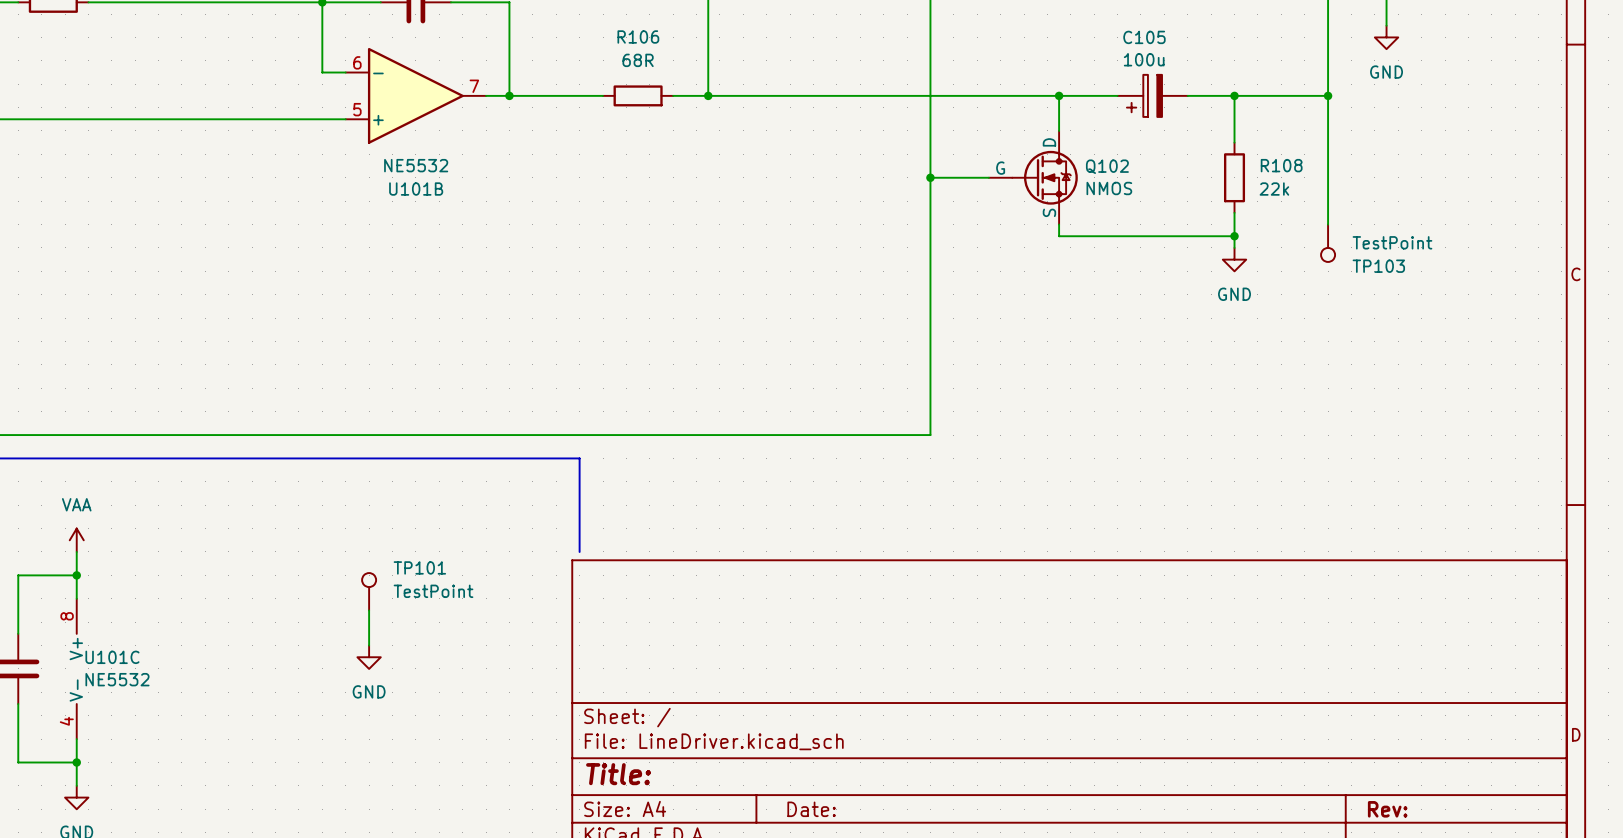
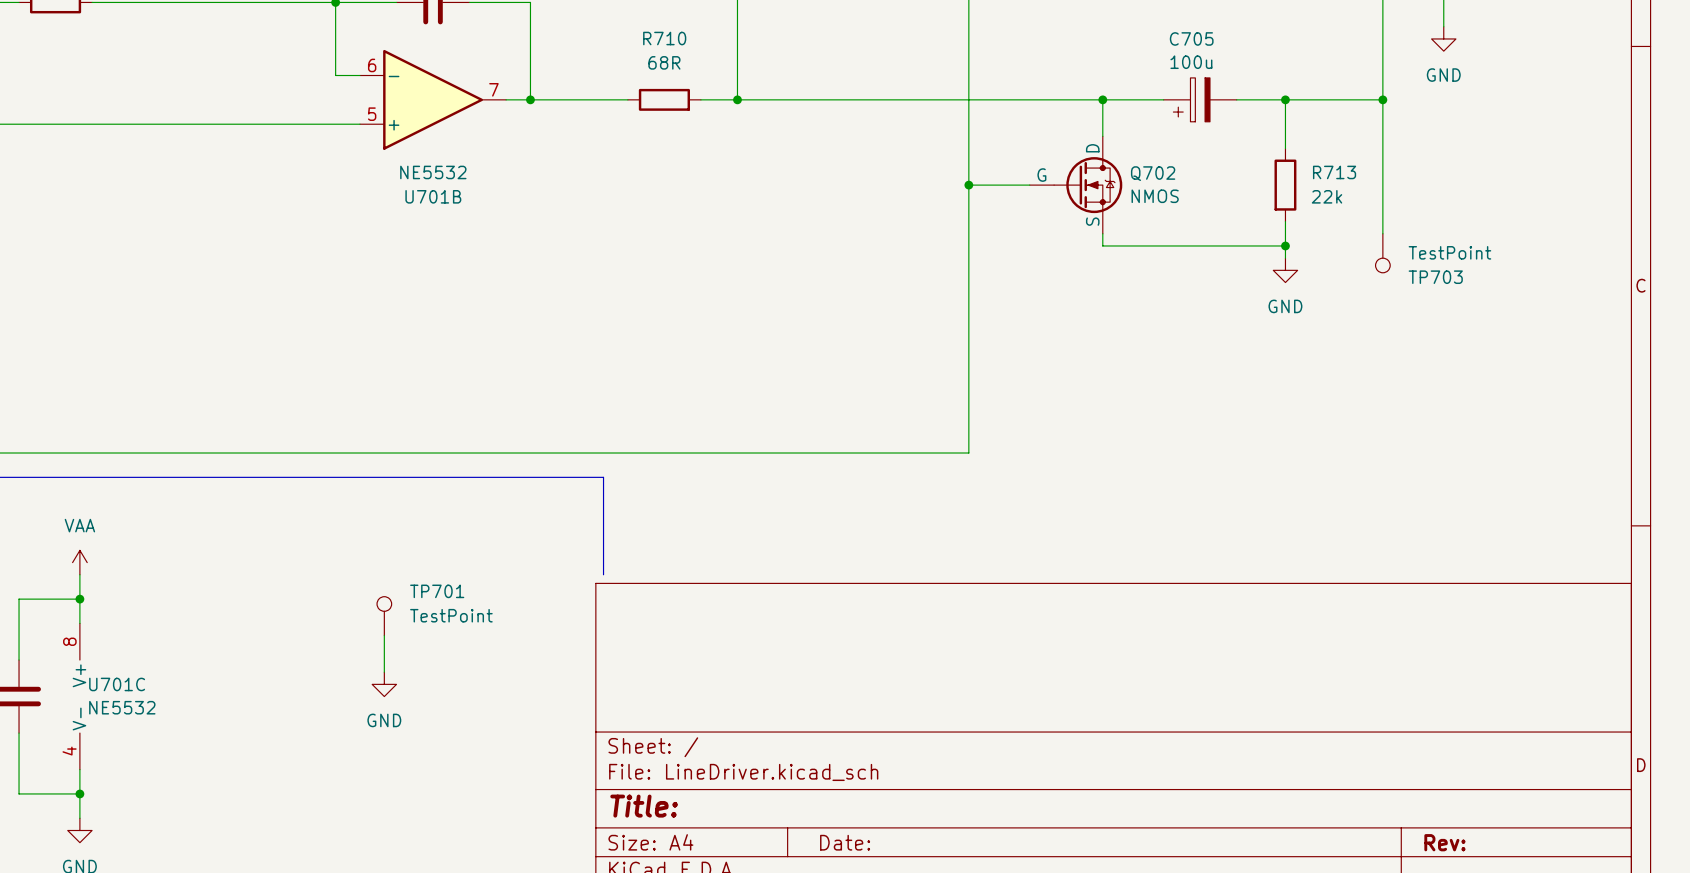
R106 name: R106 (638, 36) -> R710 (664, 38)
C105 name: C105 (1144, 37) -> C705 (1191, 38)
R108 name: R108 (1281, 165) -> R713 (1334, 172)
Q102 name: Q102 (1107, 166) -> Q702 (1153, 173)
U101B name: U101B (416, 189) -> U701B (433, 196)
TP103 name: TP103 (1378, 266) -> TP703 (1435, 277)
TP101 name: TP101 (419, 567) -> TP701 (437, 591)
U101C name: U101C (112, 657) -> U701C (117, 684)

